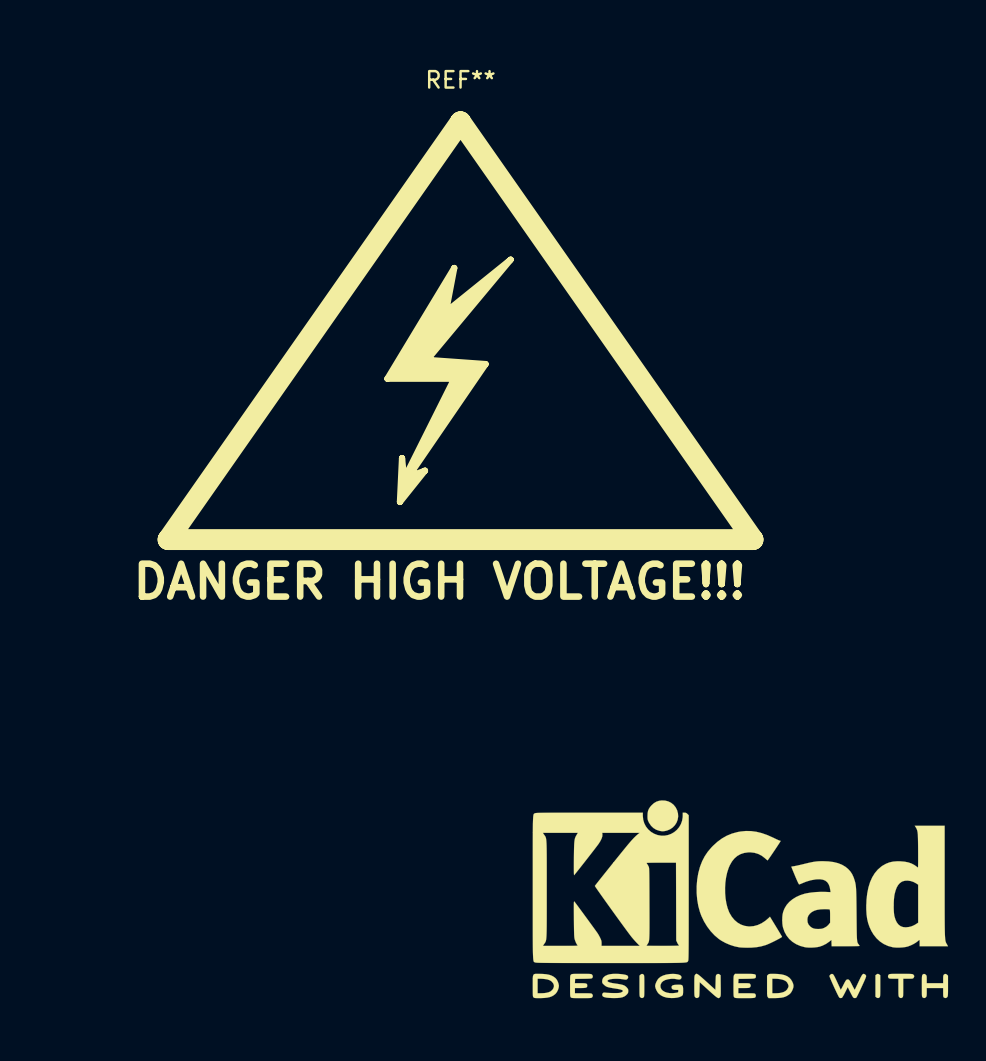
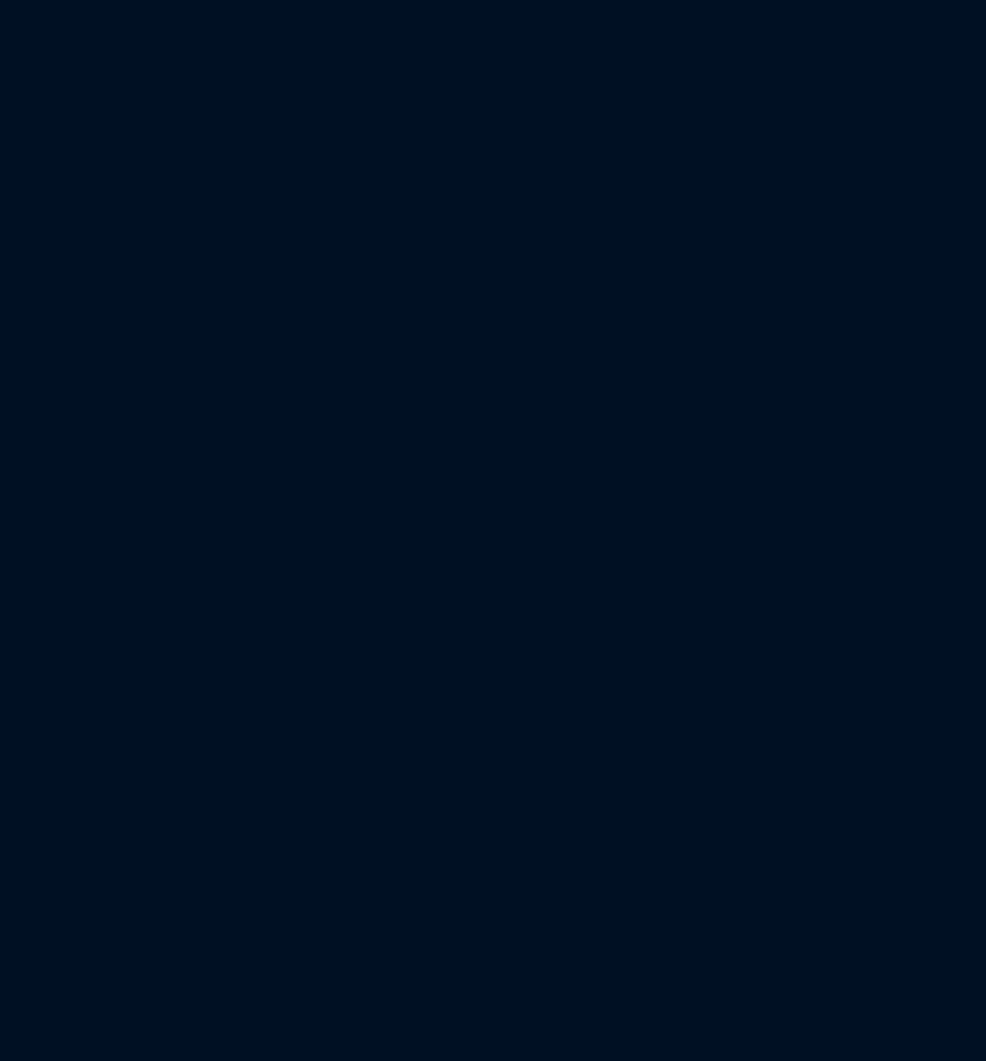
REF**: DANGER HIGH VOLTAGE!!! (460, 330) -> none
drawing: [532, 800, 949, 999] -> none

